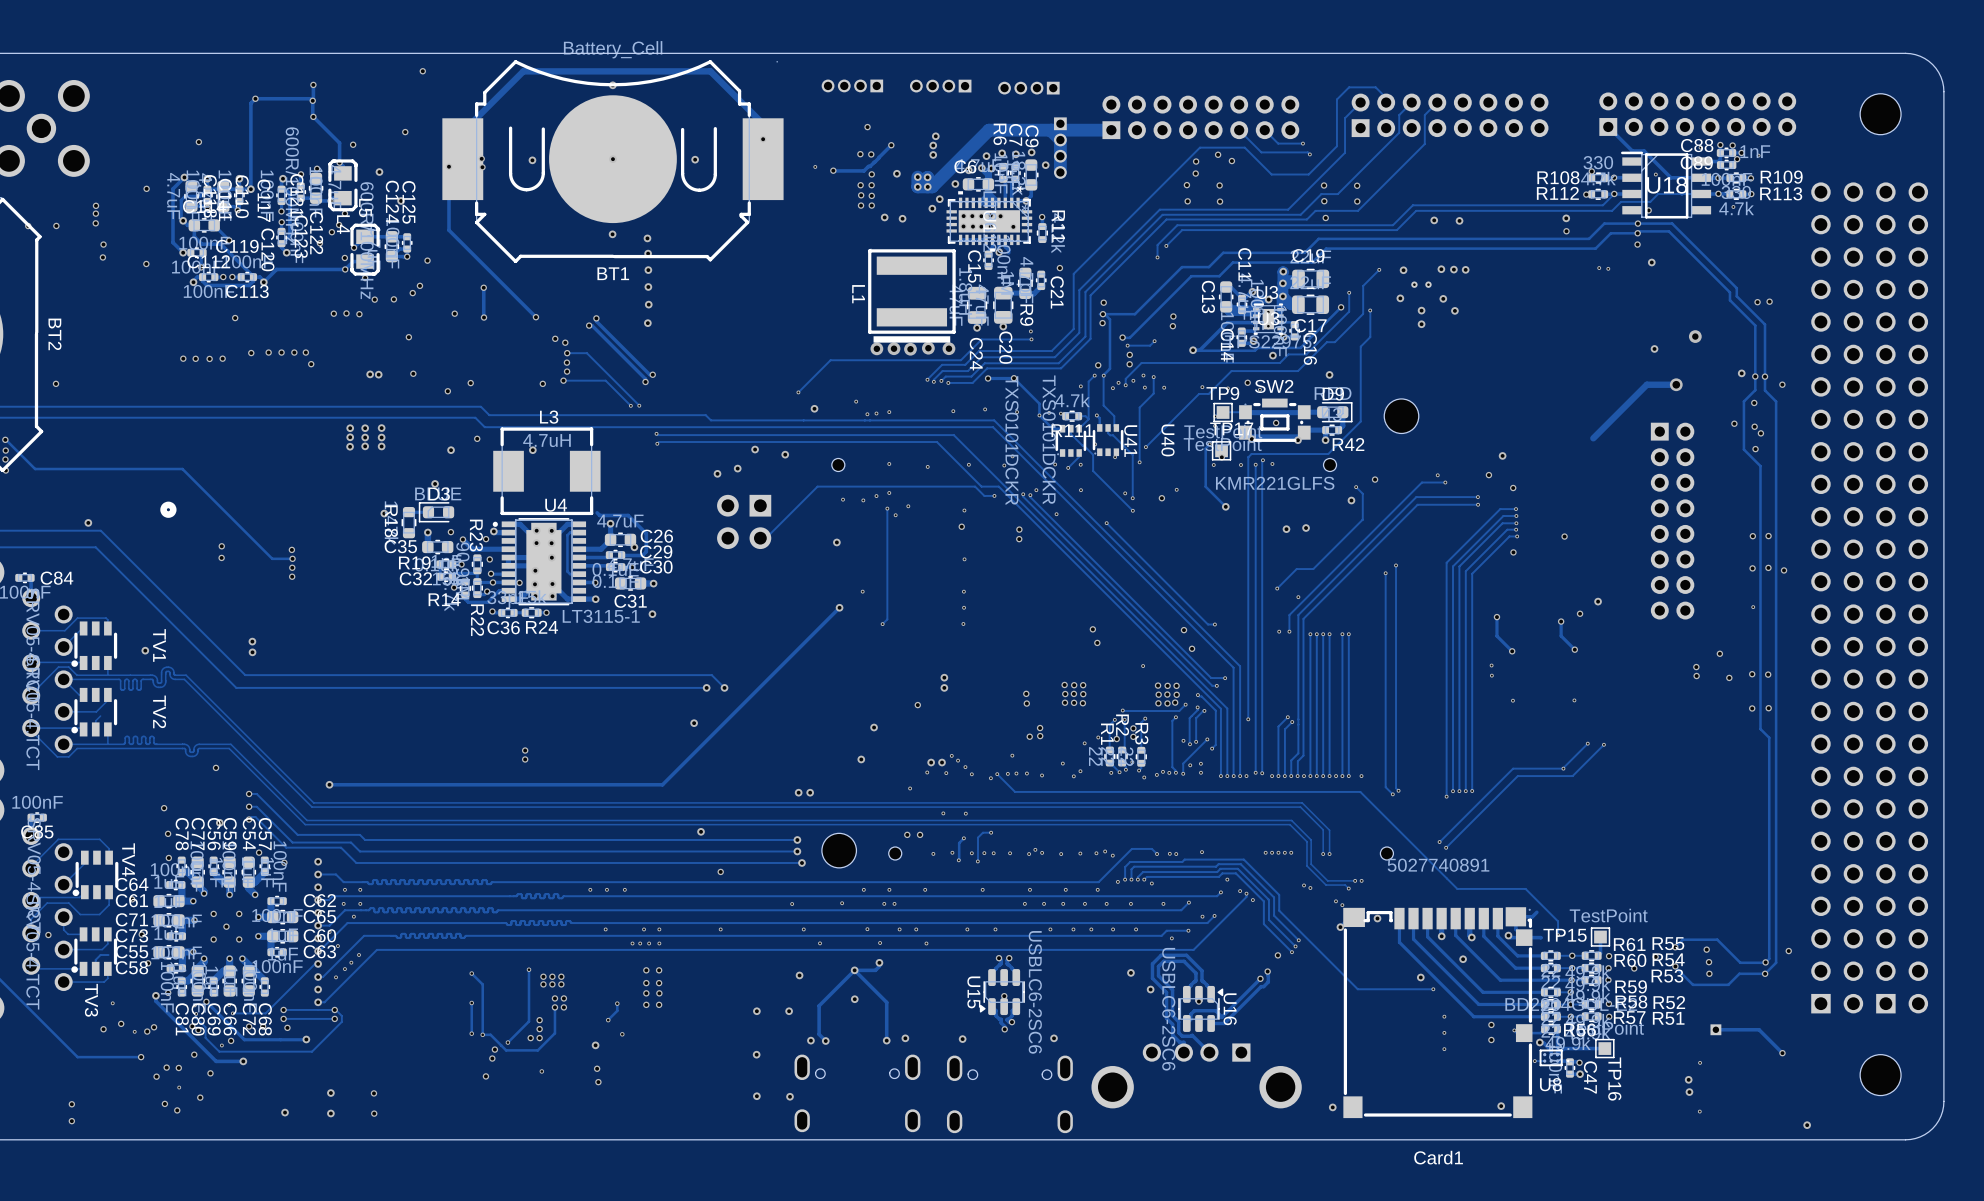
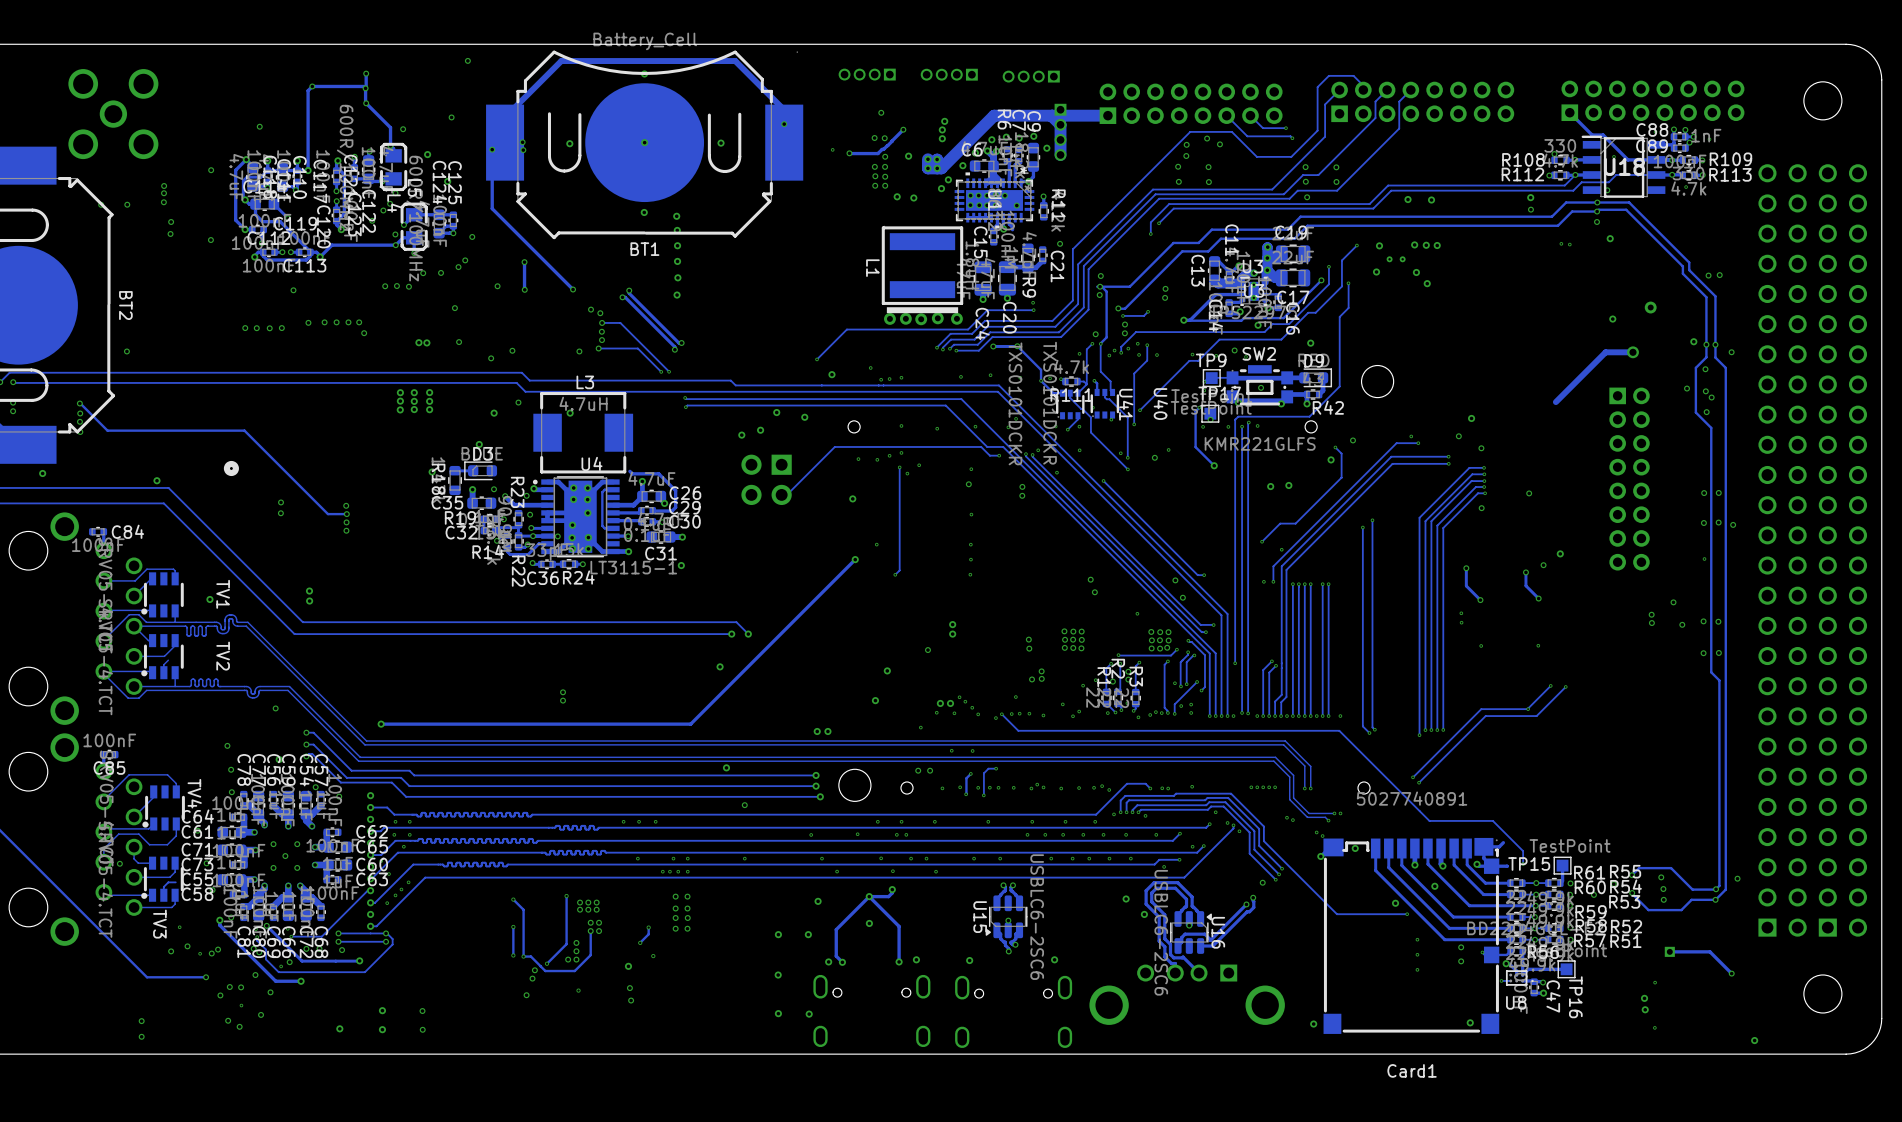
via: (1421, 310) -> none
via: (1421, 324) -> none

